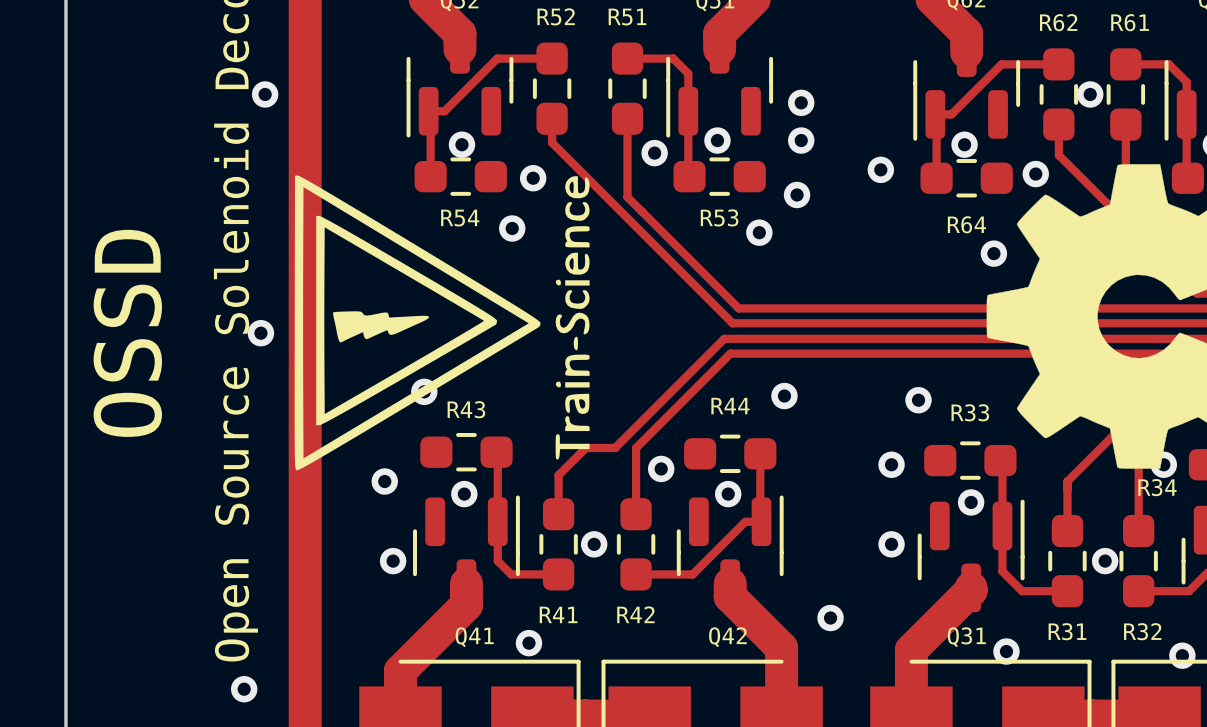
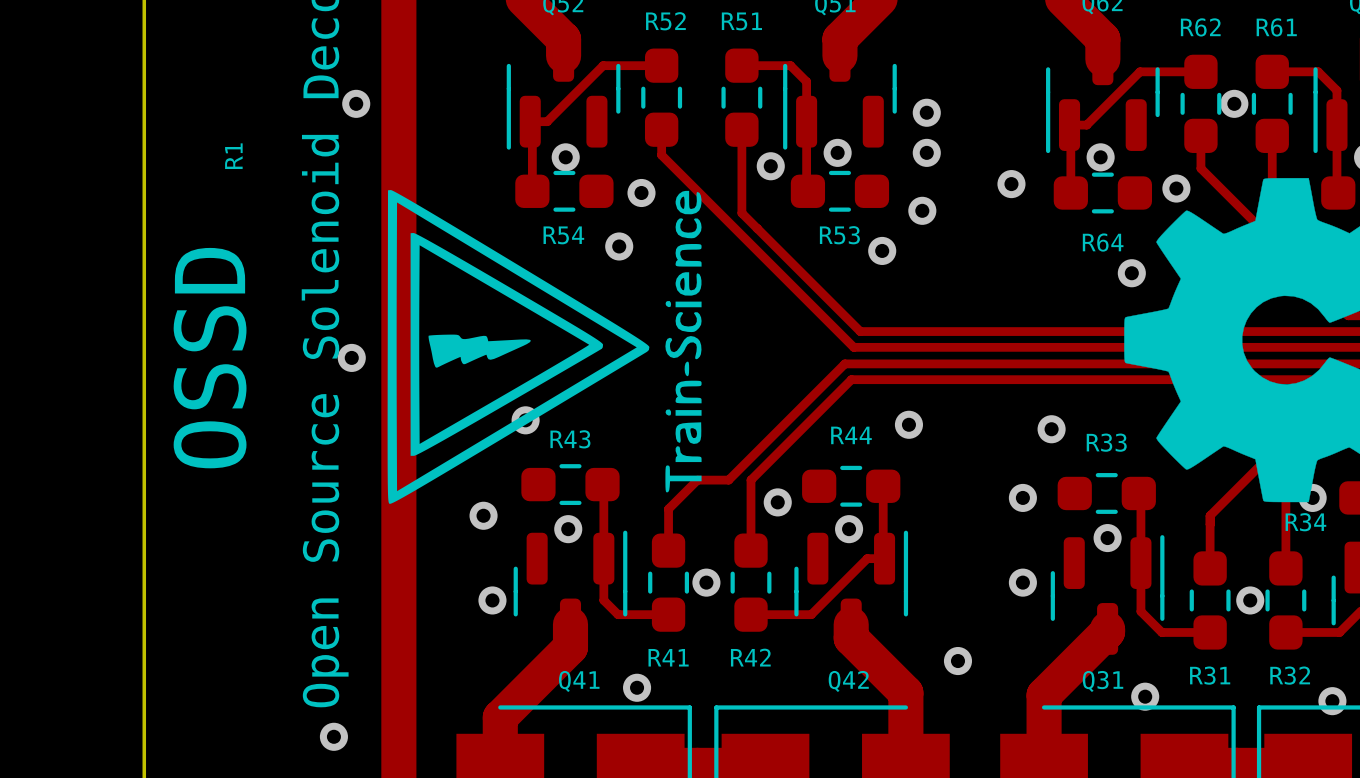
text: none -> R1 (233, 156)

